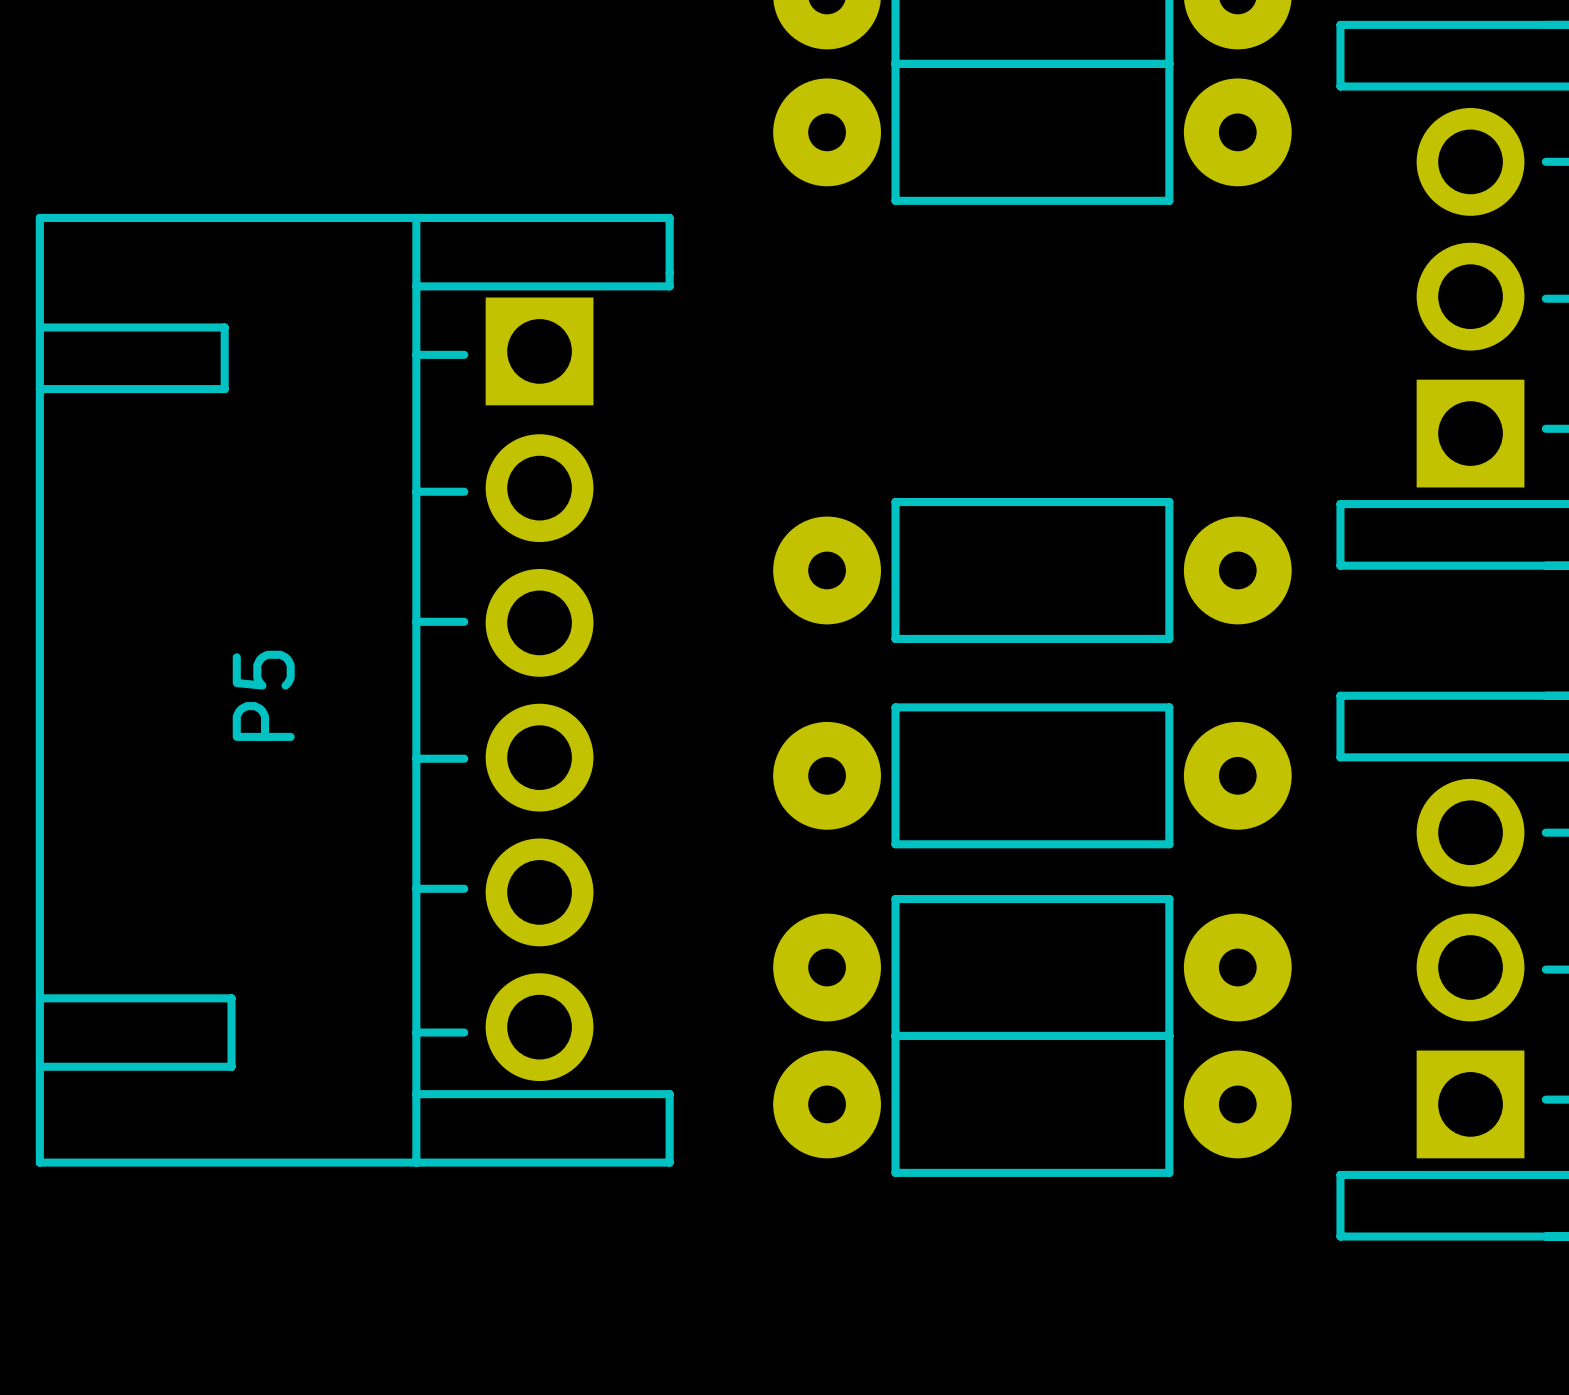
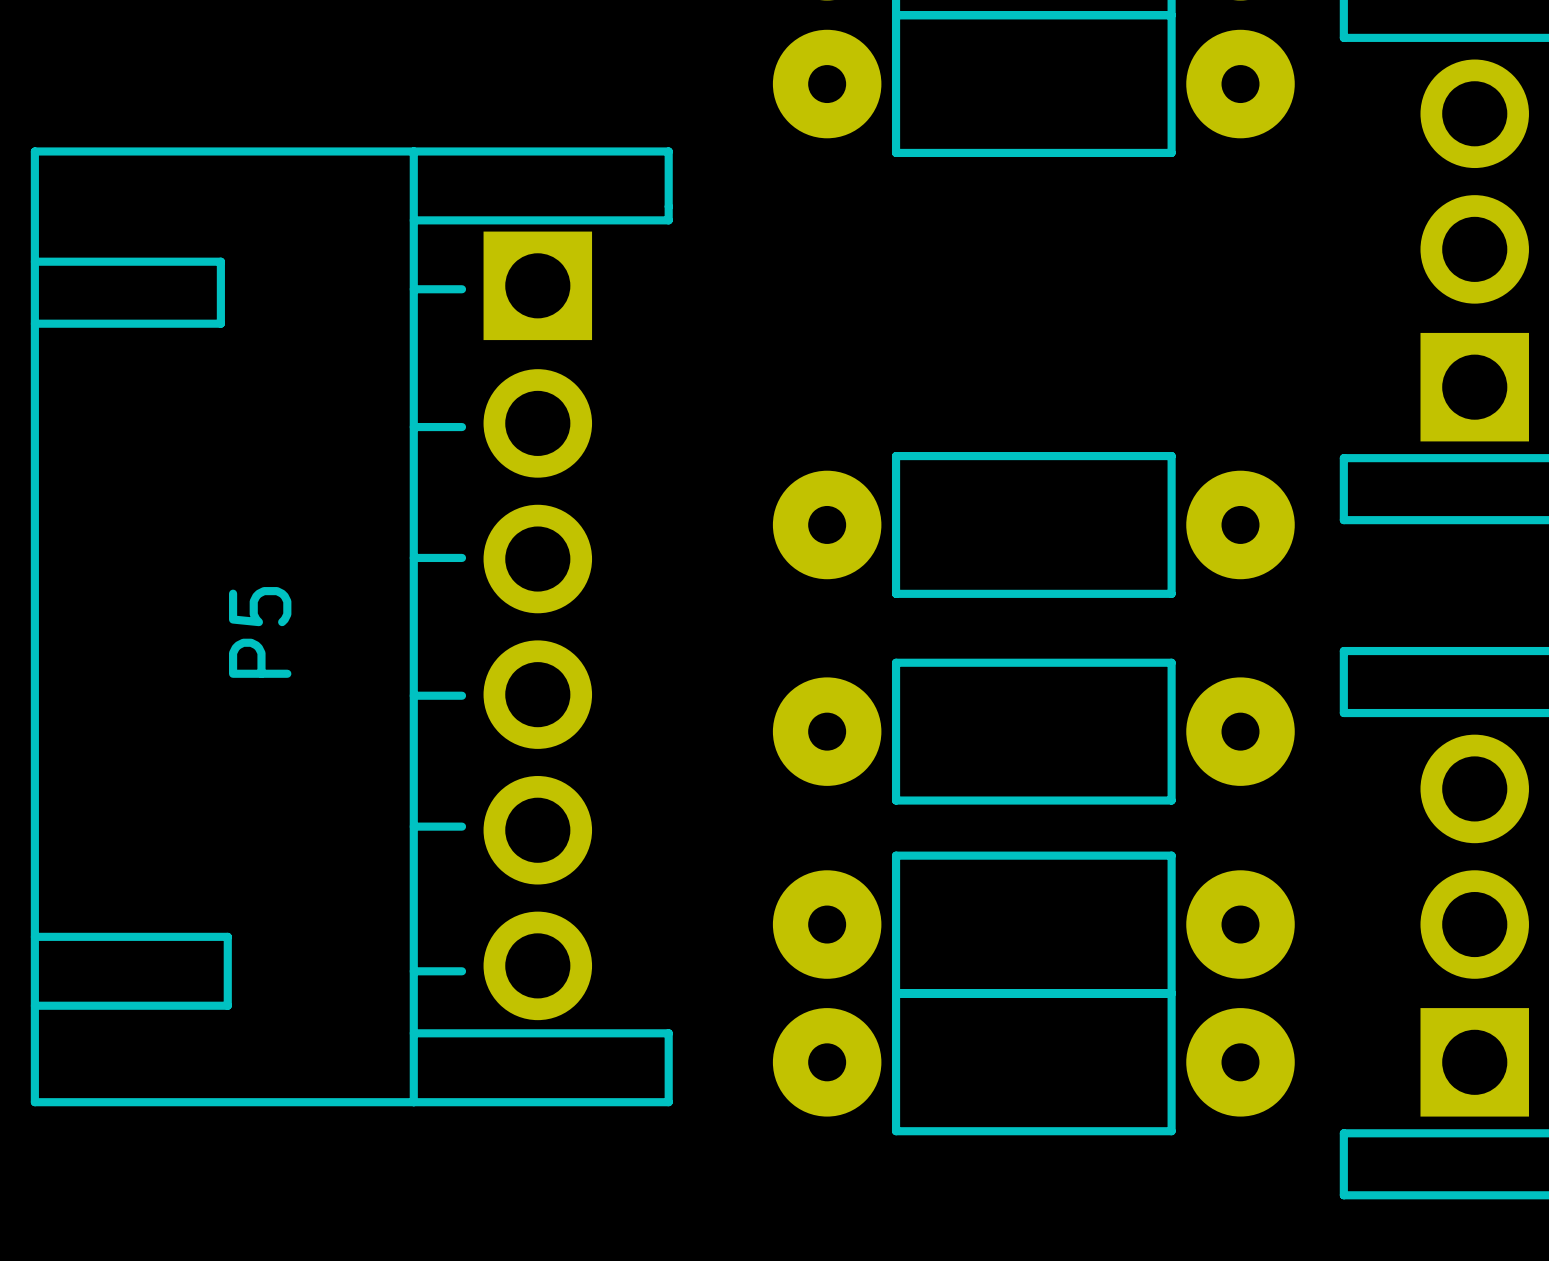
P5 position: (354, 690) -> (351, 626)

